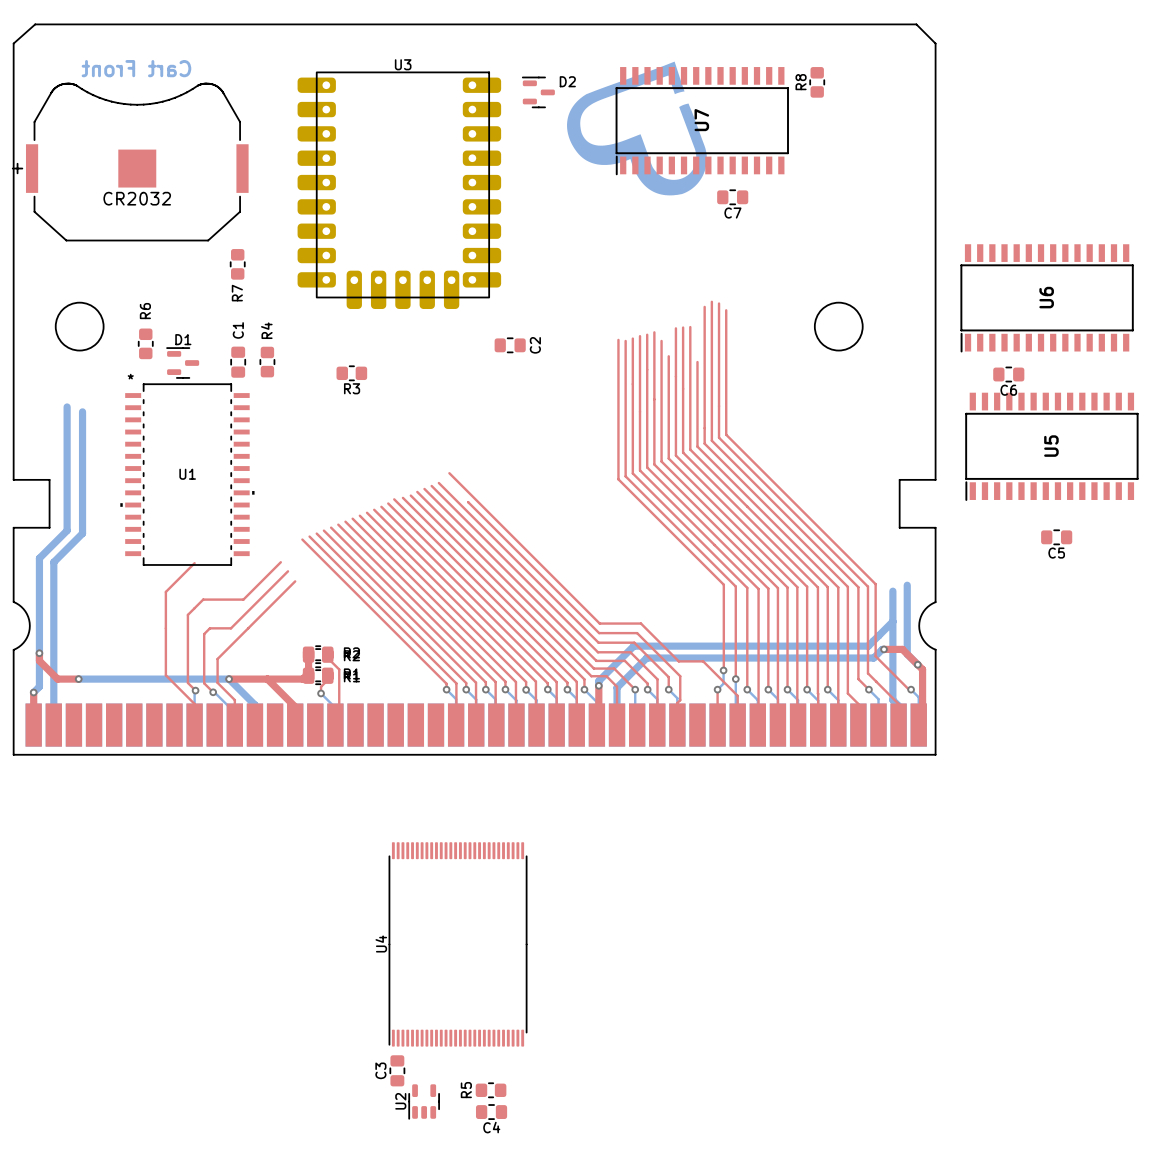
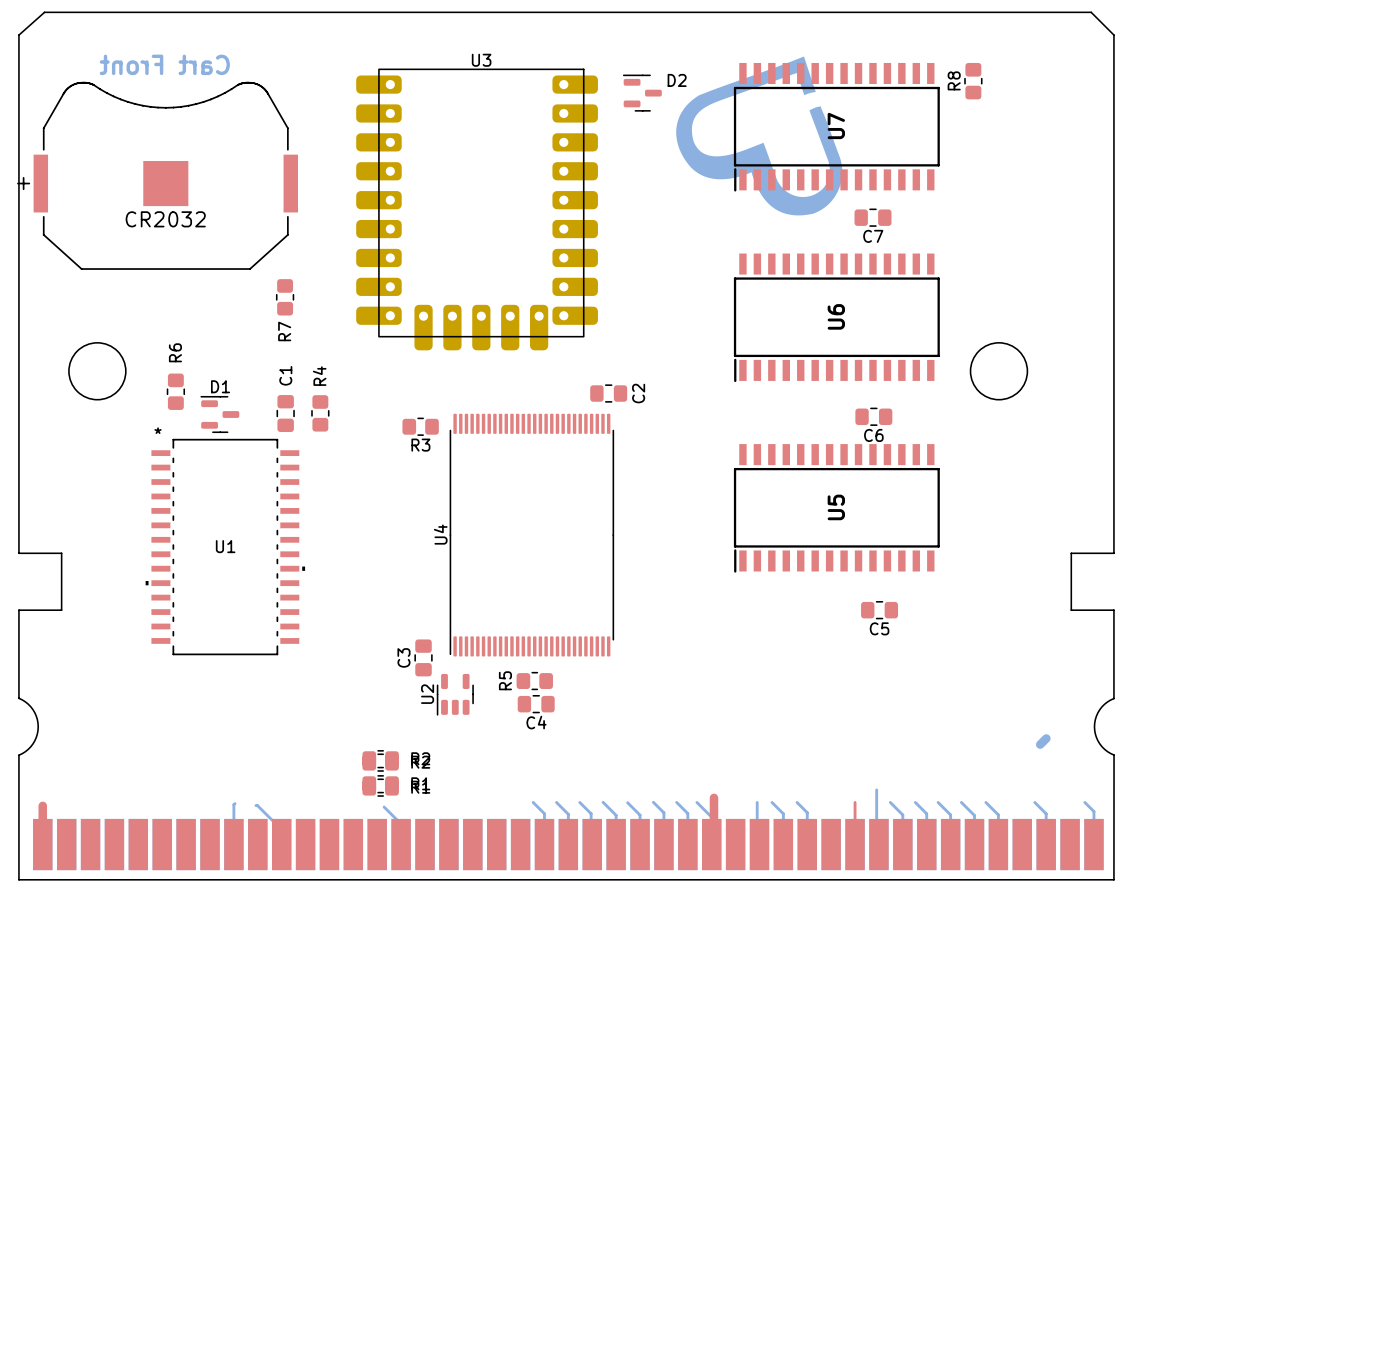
U6 position: (1047, 298) -> (836, 317)
top track: (711, 301) (711, 440) (858, 587) (858, 679) (868, 689) -> none
top track: (719, 303) (719, 437) (867, 586) (867, 673) (898, 704) (898, 727) -> none
top track: (704, 306) (704, 443) (847, 586) (847, 693) (858, 704) (858, 727) -> none
top track: (726, 310) (726, 434) (875, 584) (875, 656) (911, 689) -> none
top track: (683, 327) (683, 452) (817, 587) (818, 727) -> none
top track: (690, 327) (690, 449) (827, 587) (827, 689) -> none
top track: (675, 328) (675, 455) (807, 586) (807, 689) -> none
top track: (654, 332) (654, 464) (777, 588) (777, 727) -> none
top track: (647, 334) (647, 467) (768, 588) (768, 689) -> none
top track: (640, 336) (640, 470) (758, 588) (757, 727) -> none
top track: (632, 338) (632, 473) (747, 587) (747, 689) -> none
top track: (618, 339) (618, 479) (723, 584) (723, 670) -> none
top track: (625, 340) (625, 476) (735, 586) (735, 679) -> none
top track: (661, 340) (661, 461) (787, 587) (787, 689) -> none
top track: (668, 356) (668, 458) (797, 587) (798, 727) -> none
top track: (697, 362) (697, 446) (838, 587) (838, 727) -> none
C6 position: (1008, 374) -> (873, 416)
bottom track: (67, 406) (67, 530) (39, 558) (39, 686) (33, 692) -> none
bottom track: (82, 411) (82, 533) (53, 562) (53, 727) -> none
U5 position: (1051, 446) -> (836, 508)
top track: (449, 473) (599, 623) (640, 623) (678, 661) (703, 661) (737, 695) (737, 727) -> none
top track: (438, 483) (598, 642) (634, 642) (668, 677) (668, 689) -> none
top track: (431, 485) (597, 652) (630, 652) (657, 679) (657, 727) -> none
top track: (424, 488) (596, 660) (624, 660) (647, 683) (647, 689) -> none
top track: (417, 491) (593, 668) (614, 668) (635, 689) -> none
top track: (410, 495) (591, 676) (606, 676) (617, 686) (617, 725) -> none
top track: (402, 497) (584, 679) (584, 689) -> none
top track: (394, 499) (576, 681) (576, 727) -> none
top track: (468, 502) (599, 633) (637, 633) (680, 676) (677, 727) -> none
top track: (388, 503) (567, 682) (567, 689) -> none
top track: (381, 506) (556, 682) (556, 727) -> none
top track: (374, 509) (547, 683) (547, 689) -> none
top track: (367, 512) (535, 681) (536, 727) -> none
top track: (359, 515) (526, 682) (526, 689) -> none
top track: (352, 518) (515, 682) (516, 727) -> none
top track: (345, 521) (505, 681) (505, 689) -> none
top track: (338, 524) (495, 682) (496, 727) -> none
top track: (331, 527) (485, 682) (485, 689) -> none
top track: (323, 530) (476, 682) (476, 727) -> none
top track: (316, 533) (466, 683) (466, 689) -> none
top track: (309, 536) (456, 683) (456, 727) -> none
C5 position: (1056, 537) -> (879, 610)
top track: (302, 539) (446, 683) (446, 689) -> none
top track: (280, 562) (243, 599) (203, 599) (187, 614) (187, 682) (195, 690) -> none
top track: (194, 563) (165, 591) (165, 675) (194, 704) (194, 727) -> none
top track: (288, 571) (231, 628) (209, 628) (204, 634) (204, 683) (213, 692) -> none
top track: (295, 581) (217, 658) (217, 682) (234, 700) (234, 727) -> none
bottom track: (907, 585) (907, 654) (917, 664) -> none
bottom track: (892, 591) (892, 700) (898, 705) (898, 727) -> none
bottom track: (892, 621) (878, 635) -> none
bottom track: (873, 641) (868, 646) (633, 646) (598, 681) (598, 685) -> none
top track: (884, 649) (902, 649) (922, 669) (922, 724) (918, 727) -> none
bottom track: (884, 649) (873, 658) (646, 658) (617, 687) (617, 727) -> none
via: (884, 649) -> none
top track: (39, 653) (39, 660) (57, 679) (78, 679) -> none
via: (39, 653) -> none
top track: (308, 658) (308, 673) (302, 679) (229, 679) -> none
top track: (327, 658) (339, 669) (339, 724) (335, 727) -> none
via: (917, 664) -> none
bottom track: (723, 670) (723, 683) (717, 689) -> none
via: (723, 670) -> none
bottom track: (78, 679) (229, 679) (254, 704) (254, 727) -> none
via: (78, 679) -> none
via: (229, 679) -> none
top track: (267, 679) (295, 706) (295, 727) -> none
via: (735, 679) -> none
top track: (327, 680) (321, 686) (321, 693) -> none
via: (598, 685) -> none
via: (446, 689) -> none
via: (466, 689) -> none
via: (485, 689) -> none
via: (505, 689) -> none
via: (526, 689) -> none
via: (547, 689) -> none
via: (567, 689) -> none
via: (584, 689) -> none
via: (635, 689) -> none
via: (647, 689) -> none
via: (668, 689) -> none
via: (717, 689) -> none
via: (747, 689) -> none
via: (768, 689) -> none
via: (787, 689) -> none
via: (807, 689) -> none
via: (827, 689) -> none
via: (868, 689) -> none
via: (911, 689) -> none
via: (195, 690) -> none
via: (33, 692) -> none
via: (213, 692) -> none
via: (321, 693) -> none
U4 position: (458, 944) -> (531, 535)
C3 position: (397, 1070) -> (423, 657)
R5 position: (491, 1090) -> (534, 681)
U2 position: (424, 1101) -> (455, 694)
C4 position: (491, 1112) -> (536, 704)

